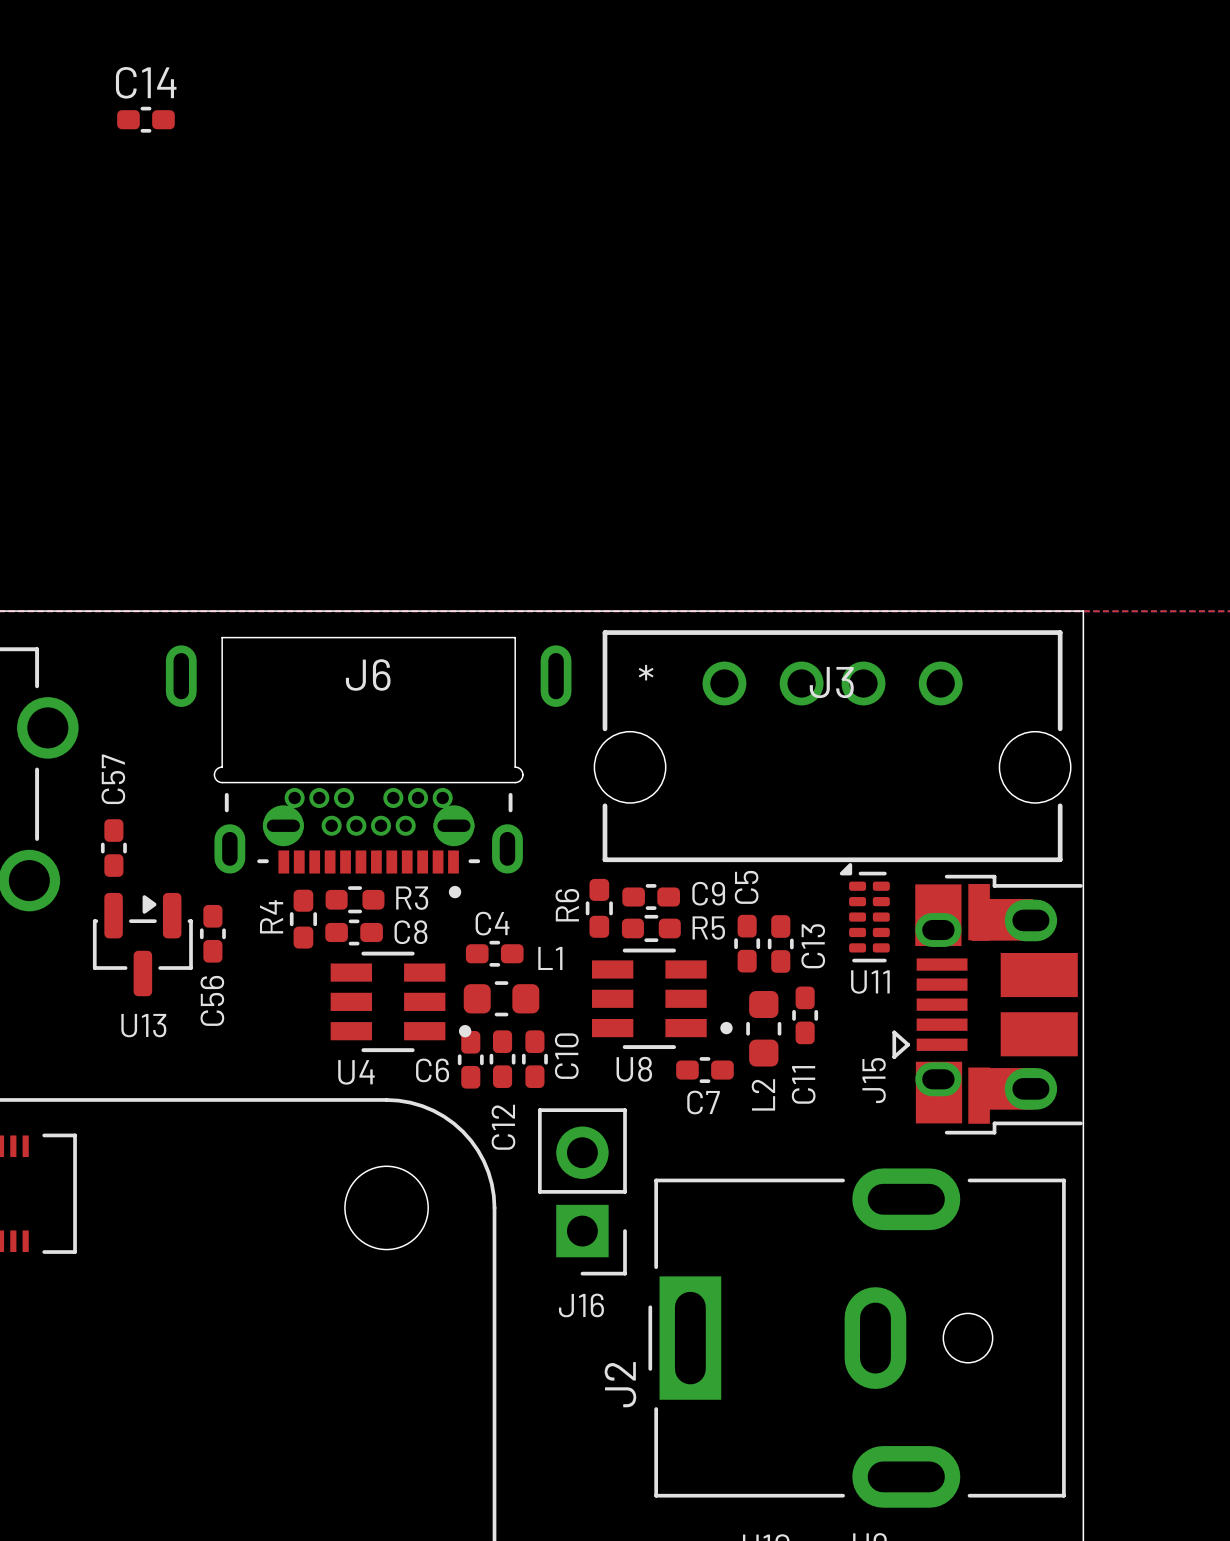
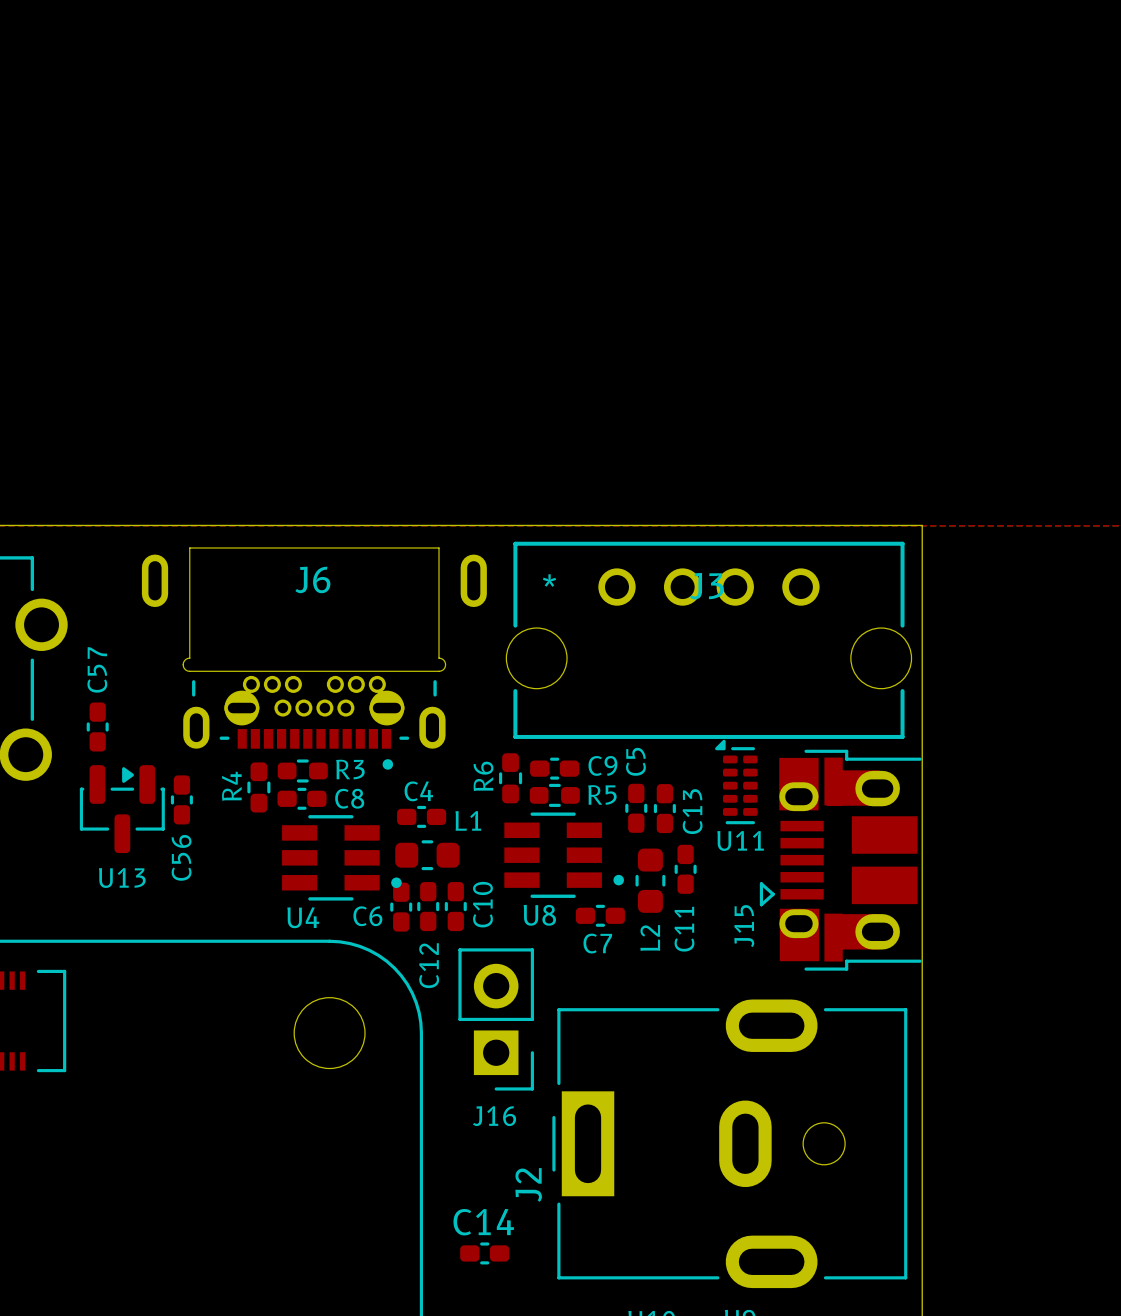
C14 position: (145, 119) -> (484, 1253)

